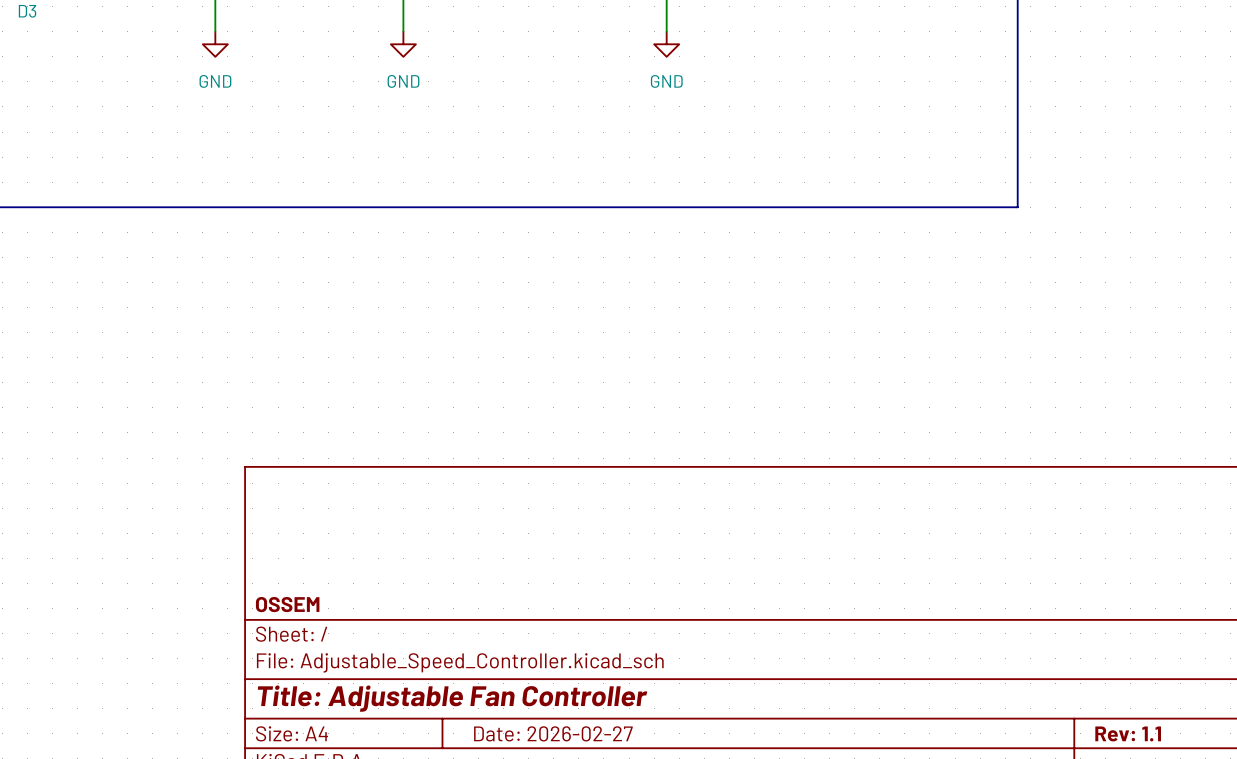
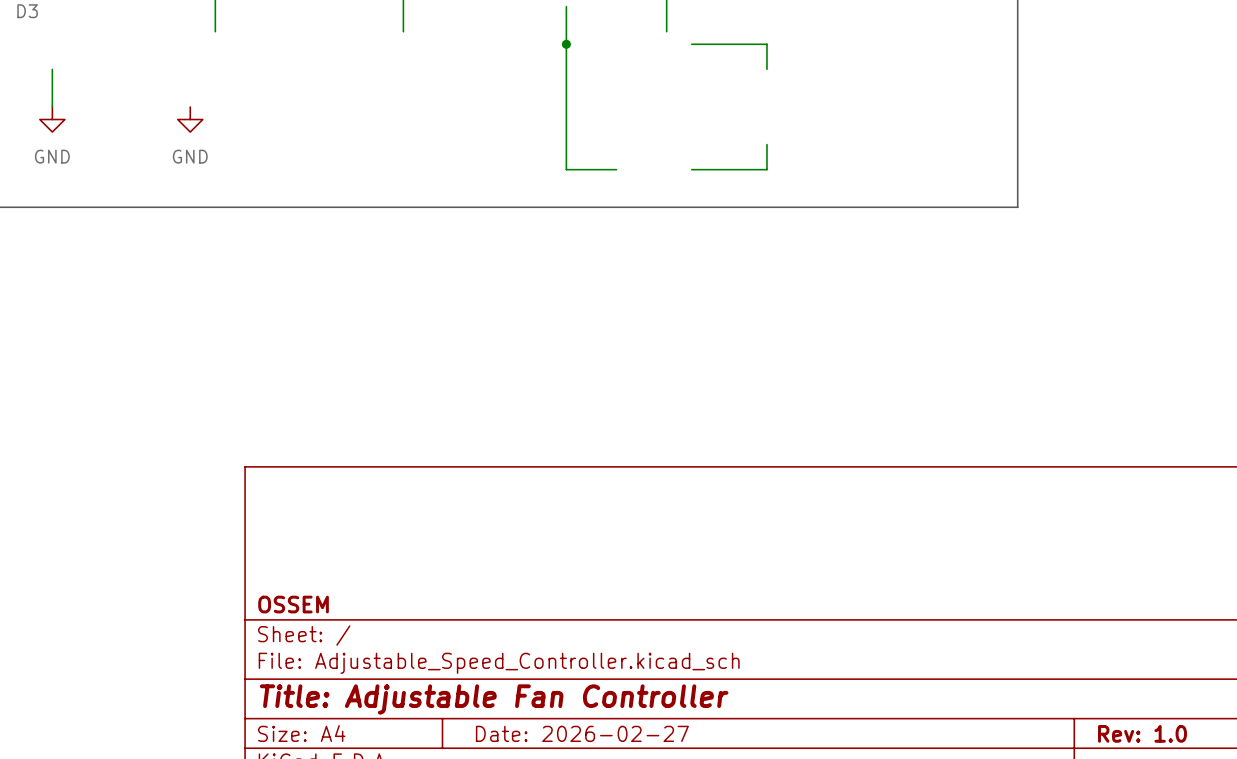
wire: none -> (566, 6) (566, 169) (616, 169)
power symbol position: GND (215, 44) -> GND (190, 119)
power symbol: GND (403, 44) -> none
junction: none -> (566, 44)
power symbol: GND (666, 44) -> none
wire: none -> (691, 44) (766, 44) (766, 69)
wire: none -> (52, 69) (52, 106)
power symbol: none -> GND (52, 119)
wire: none -> (766, 144) (766, 169) (691, 169)
title block: Rev: 1.1 (1128, 733) -> Rev: 1.0 (1142, 733)

